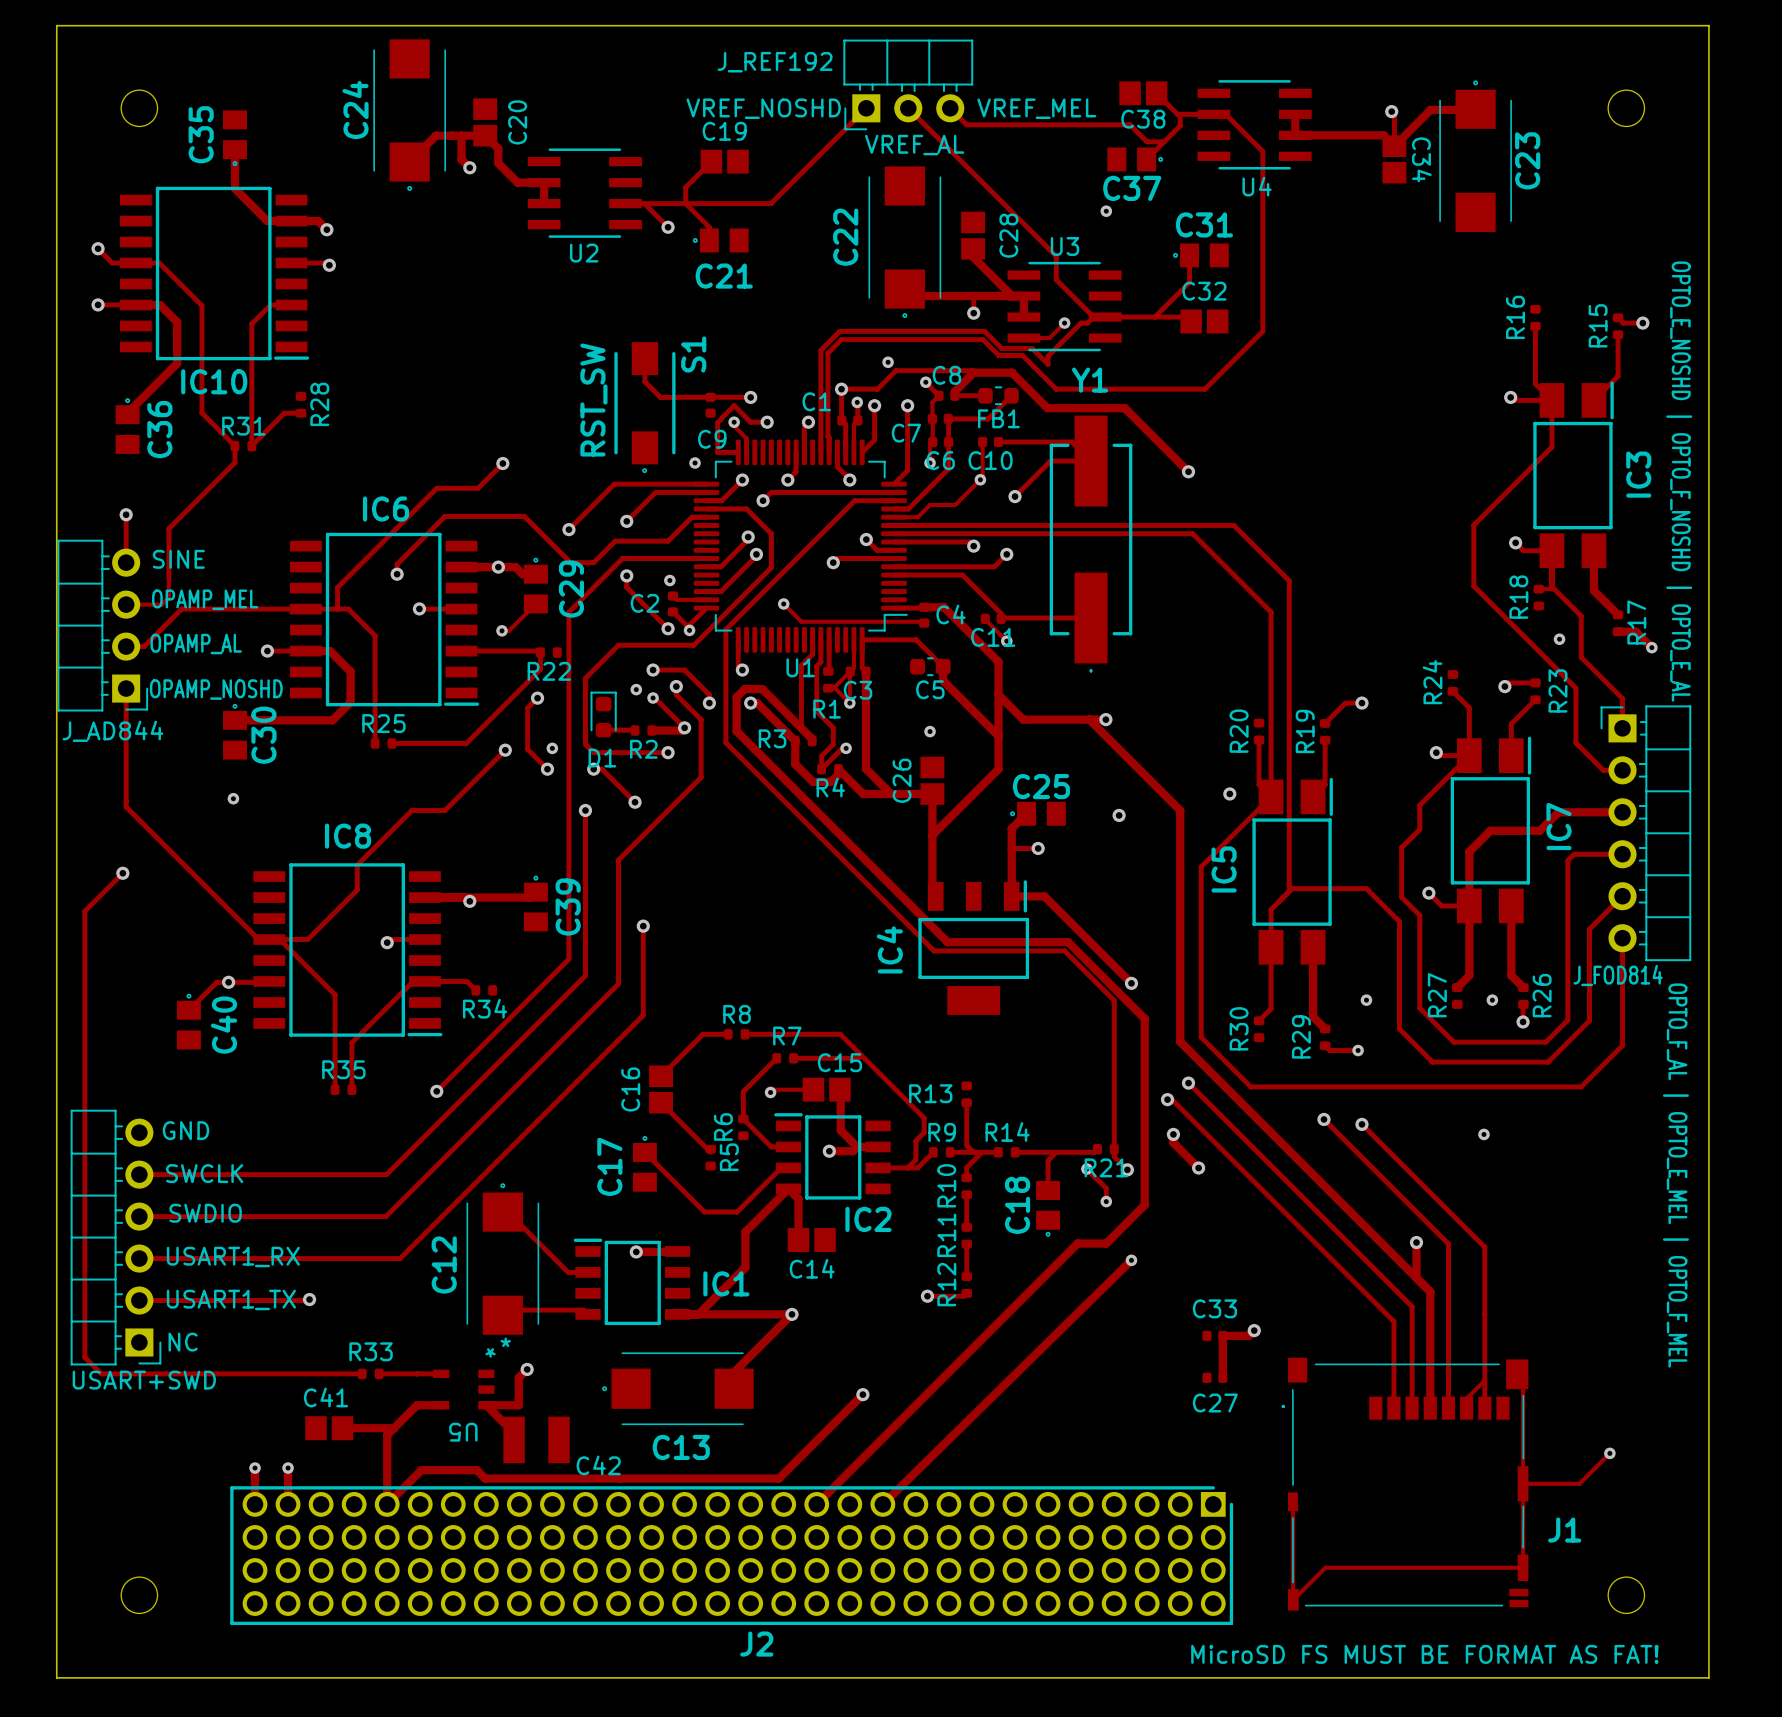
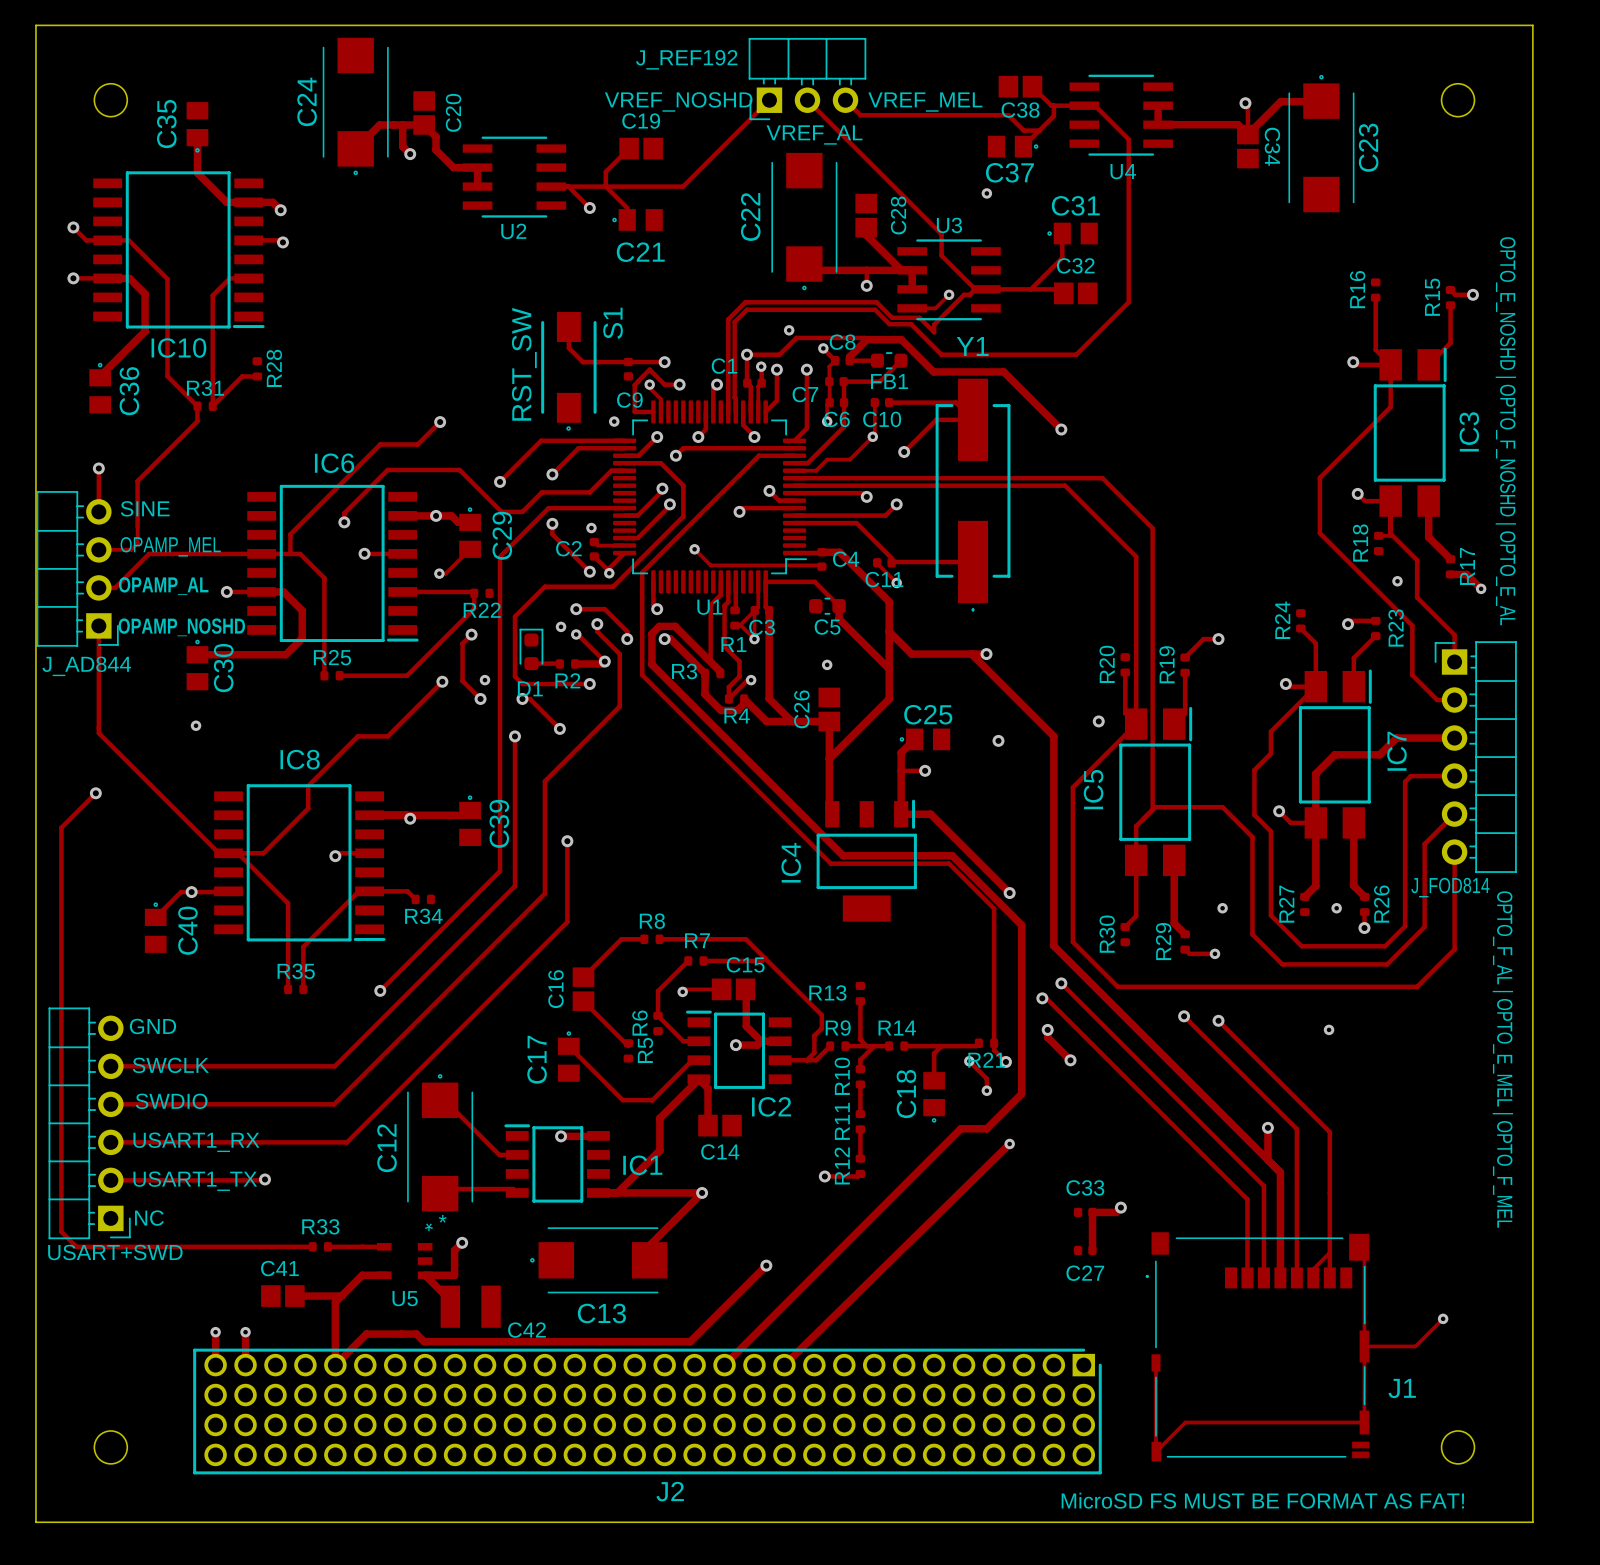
U5 name rotation: 0° (463, 1432) -> 180° (405, 1298)

